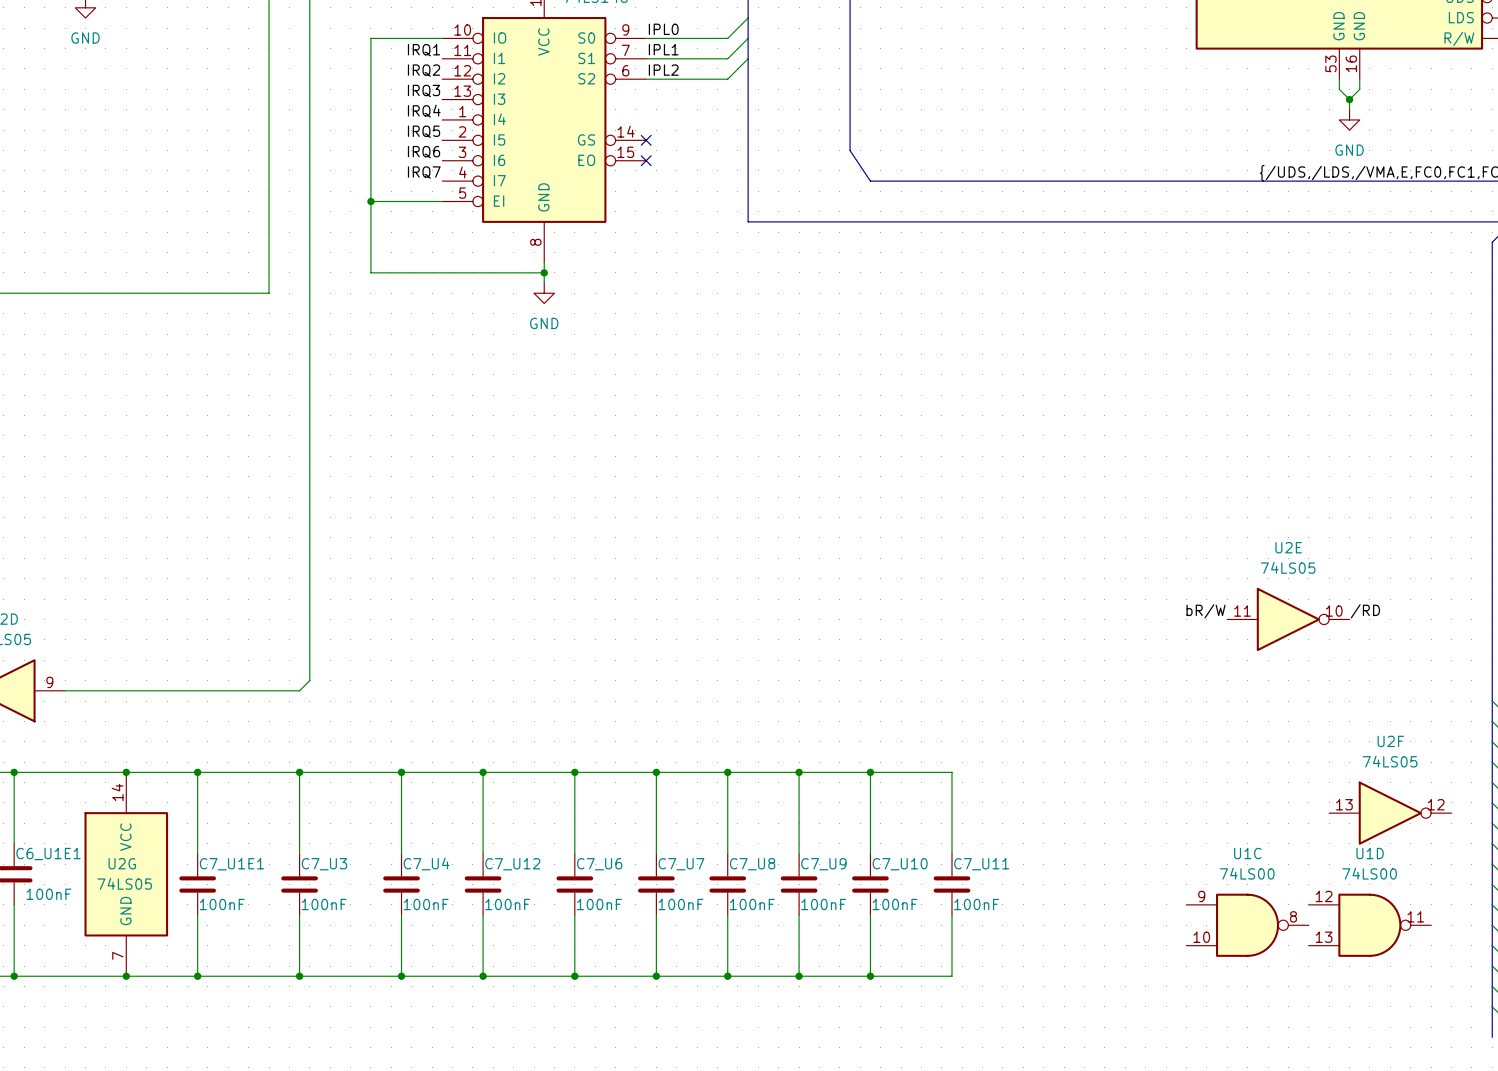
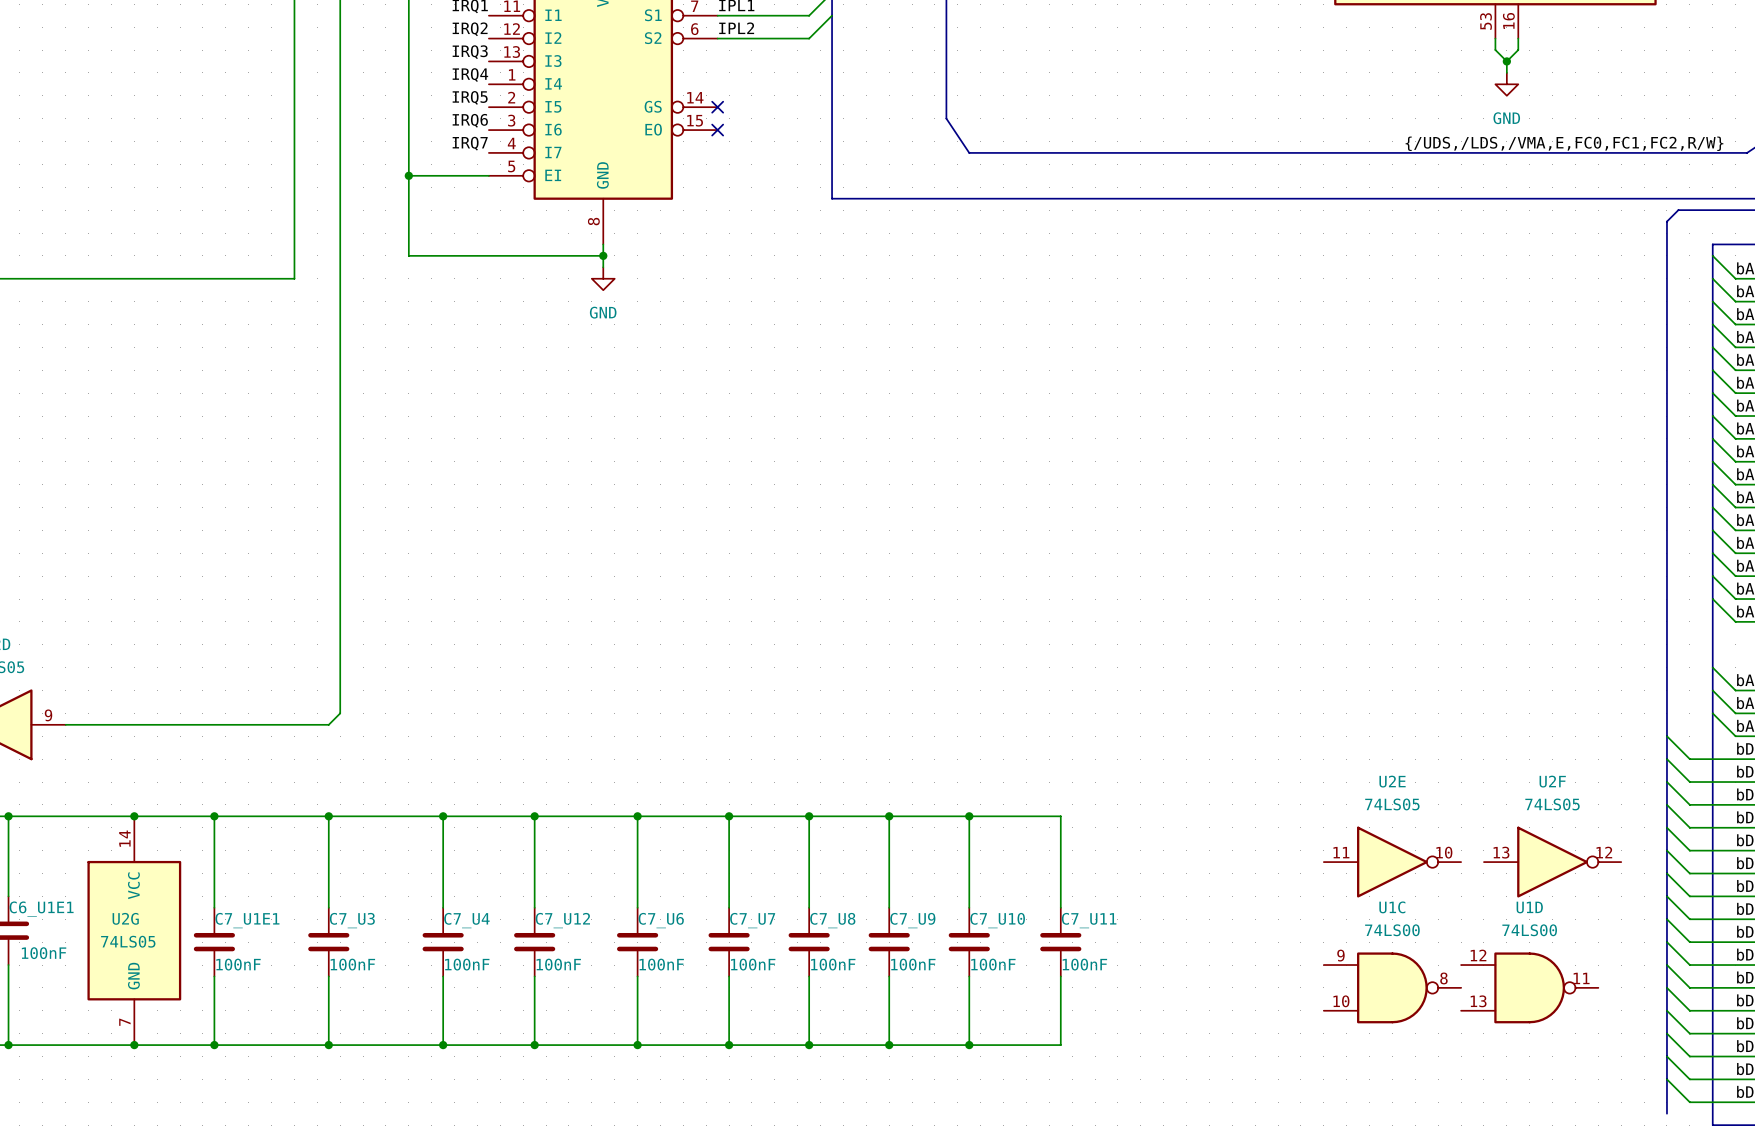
label: bR/W (1206, 611) -> none
label: /RD (1365, 611) -> none
U2E position: (1288, 619) -> (1392, 862)

